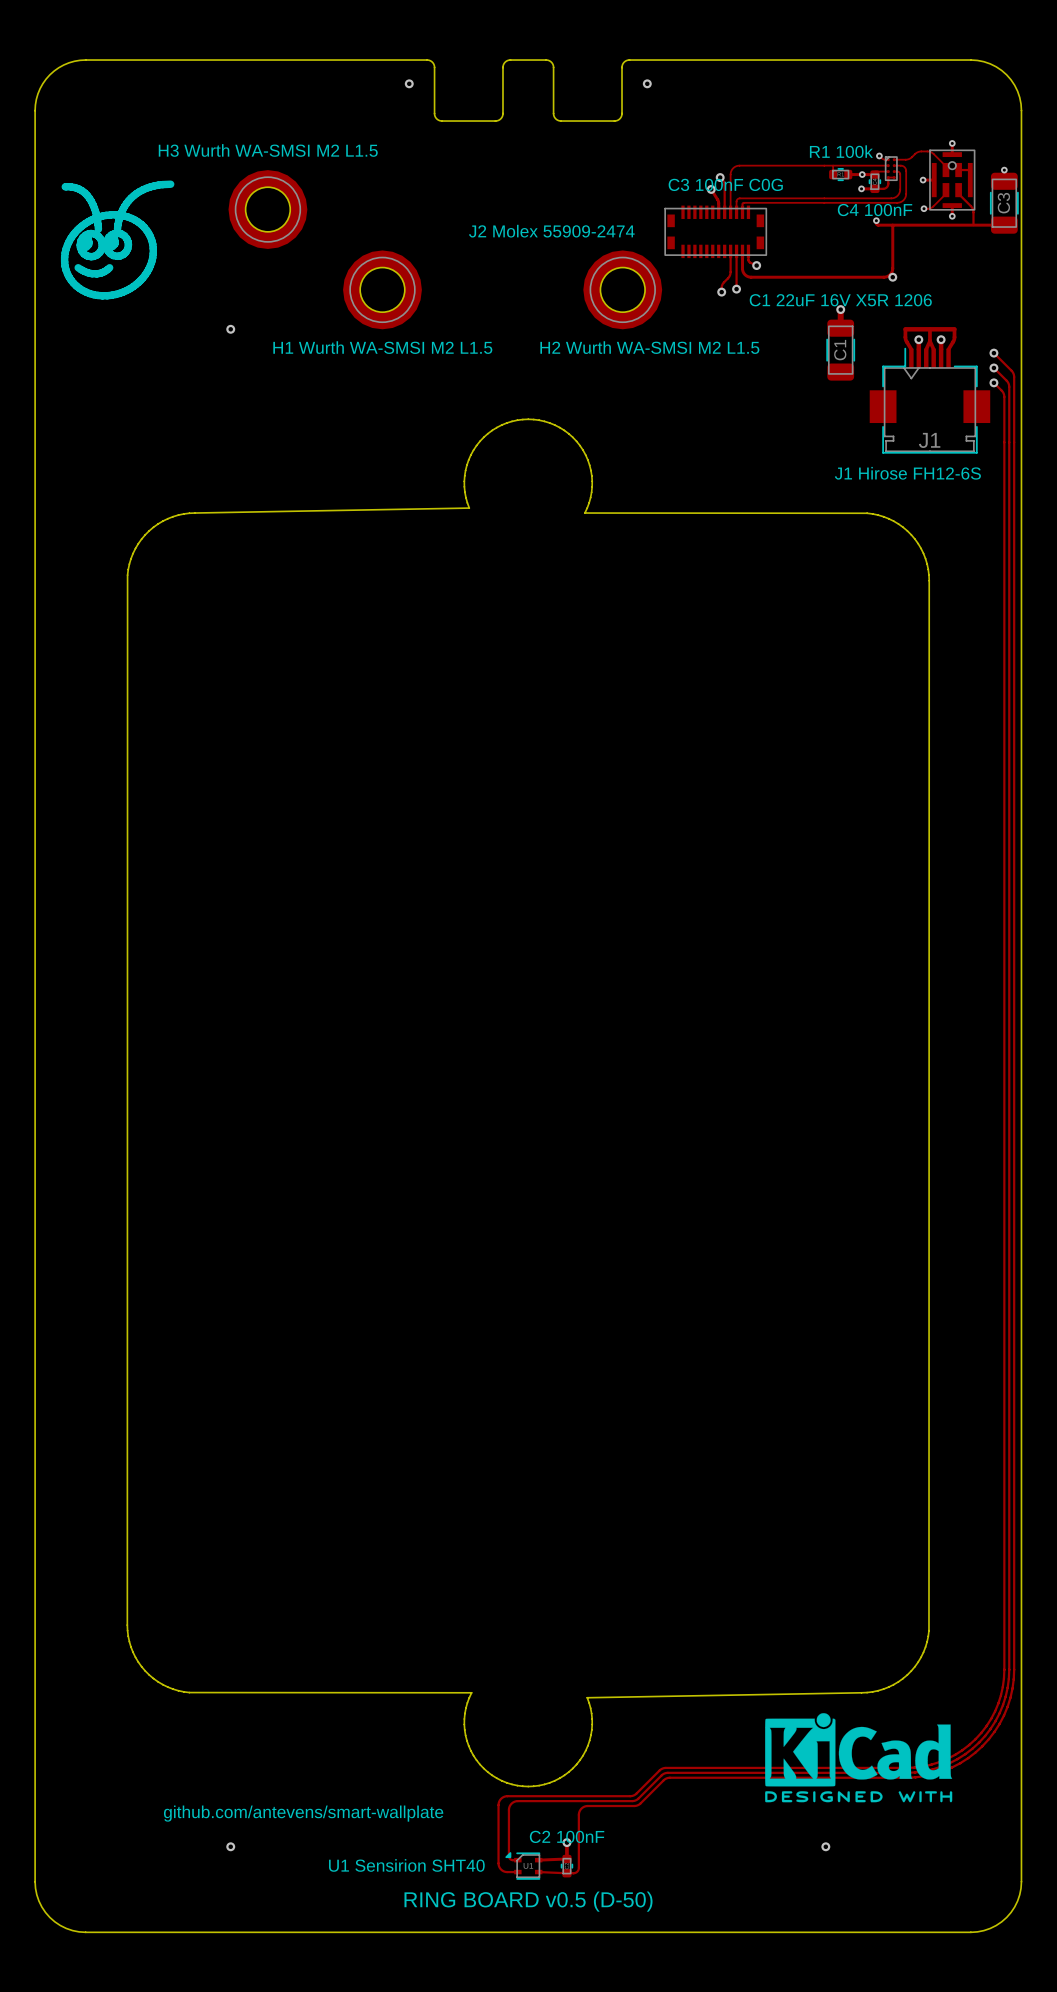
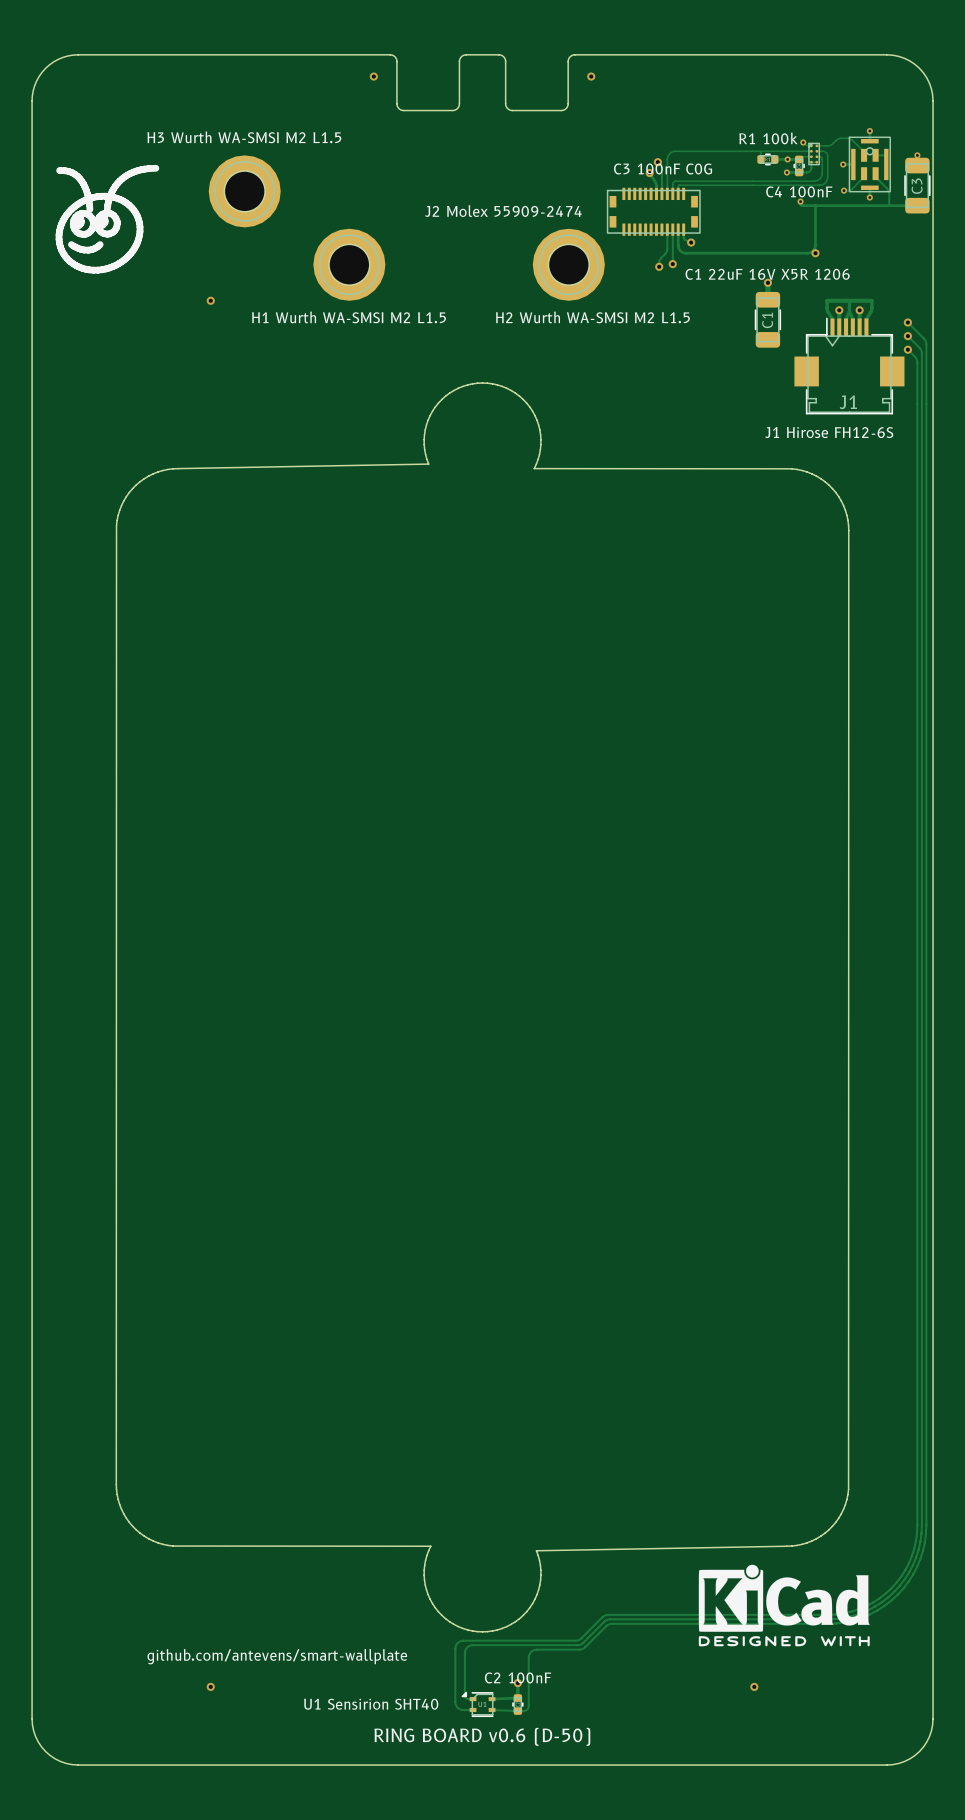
text: RING BOARD v0.5 (D-50) (528, 1901) -> RING BOARD v0.6 (D-50) (482, 1736)

